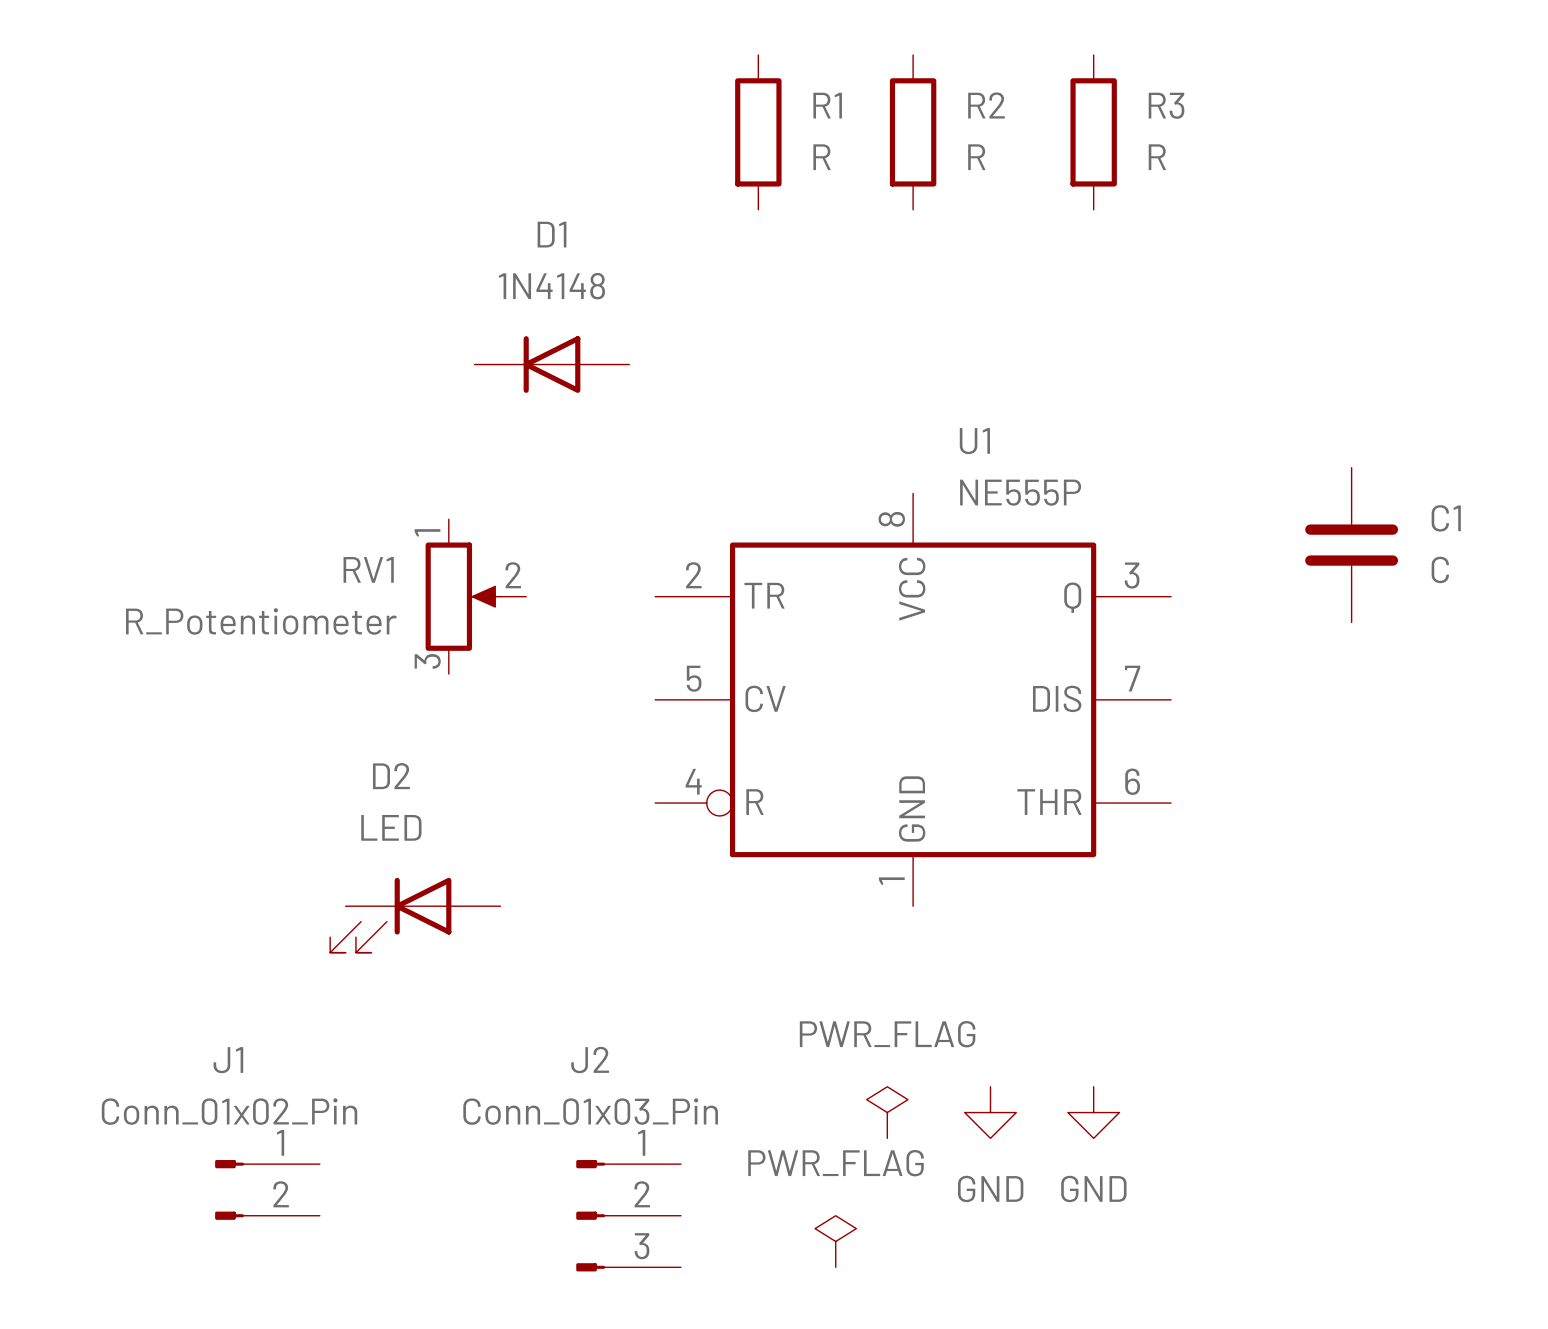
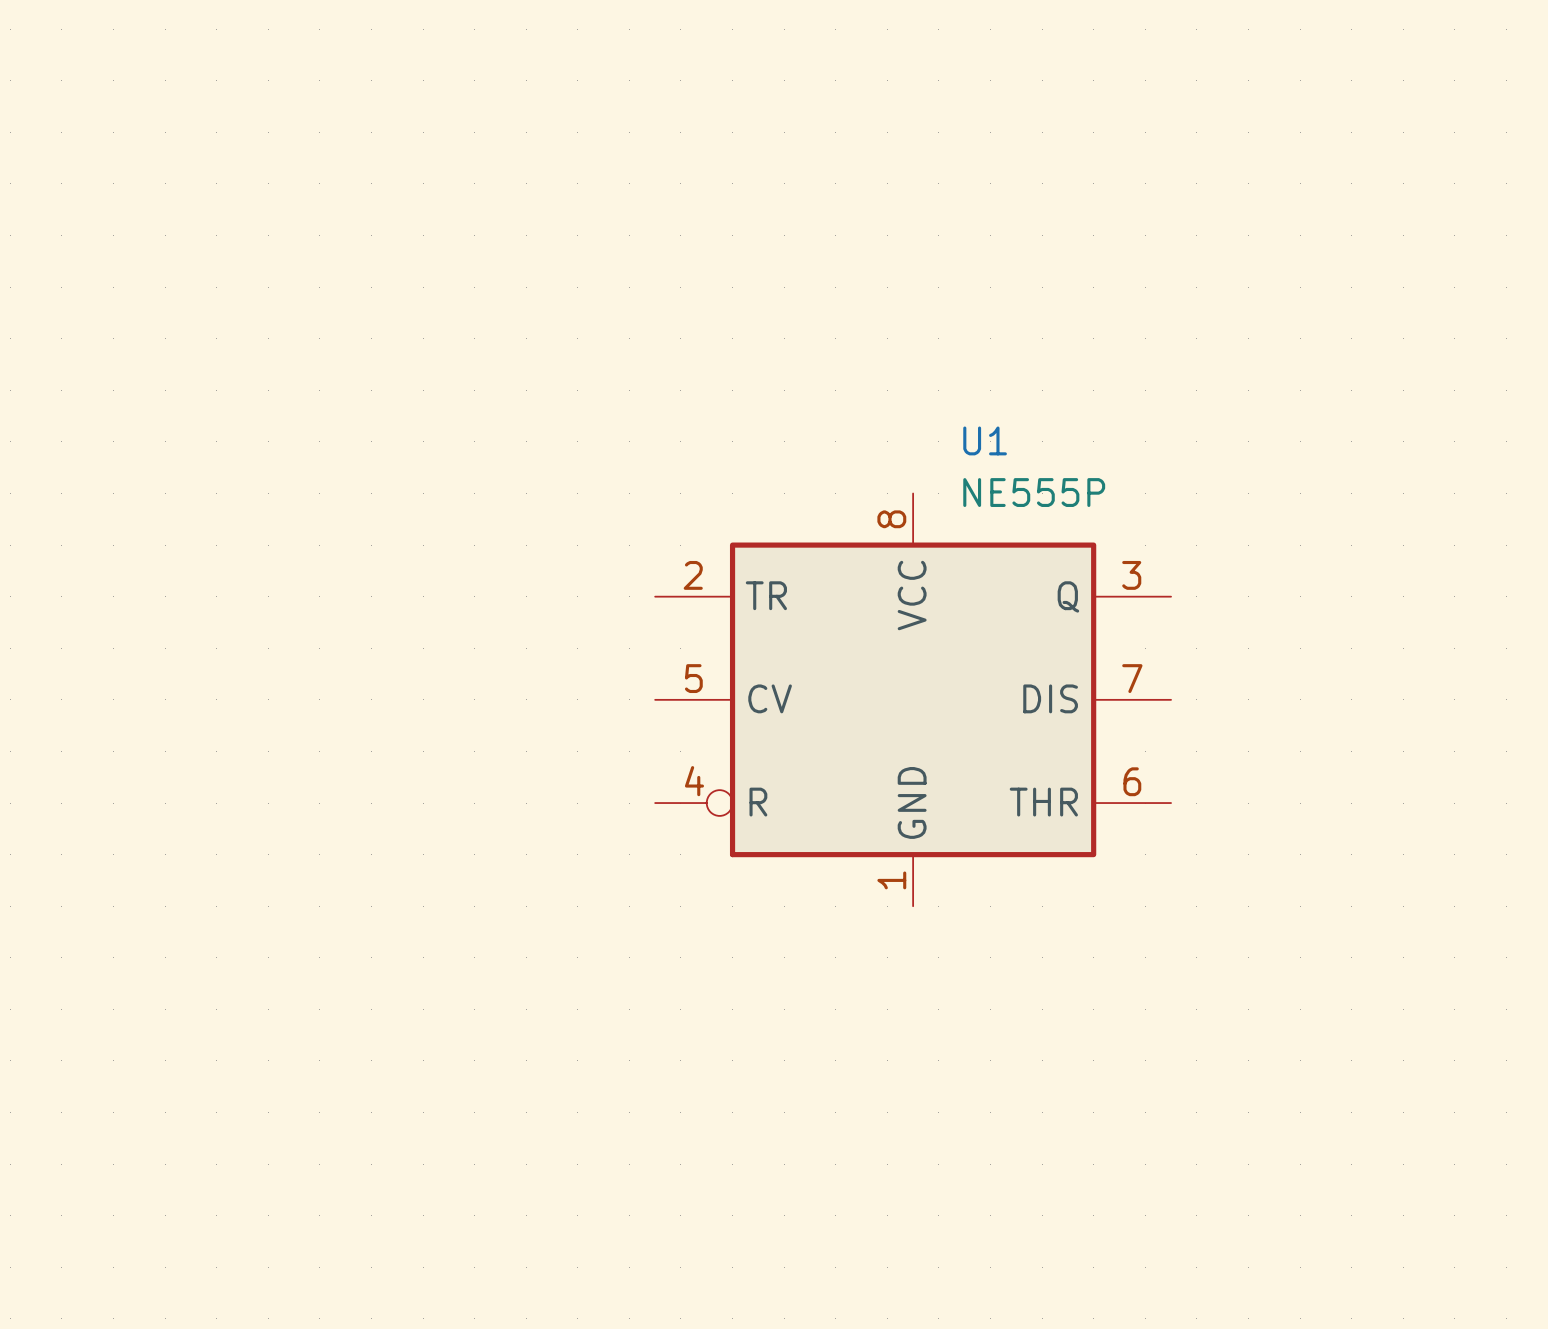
R1: R (758, 132) -> none
R2: R (913, 132) -> none
R3: R (1093, 132) -> none
D1: 1N4148 (551, 364) -> none
C1: C (1351, 545) -> none
RV1: R_Potentiometer (475, 596) -> none
D2: LED (415, 915) -> none
power symbol: PWR_FLAG (887, 1112) -> none
power symbol: GND (990, 1112) -> none
power symbol: GND (1093, 1112) -> none
J1: Conn_01x02_Pin (267, 1189) -> none
J2: Conn_01x03_Pin (628, 1215) -> none
power symbol: PWR_FLAG (835, 1241) -> none

